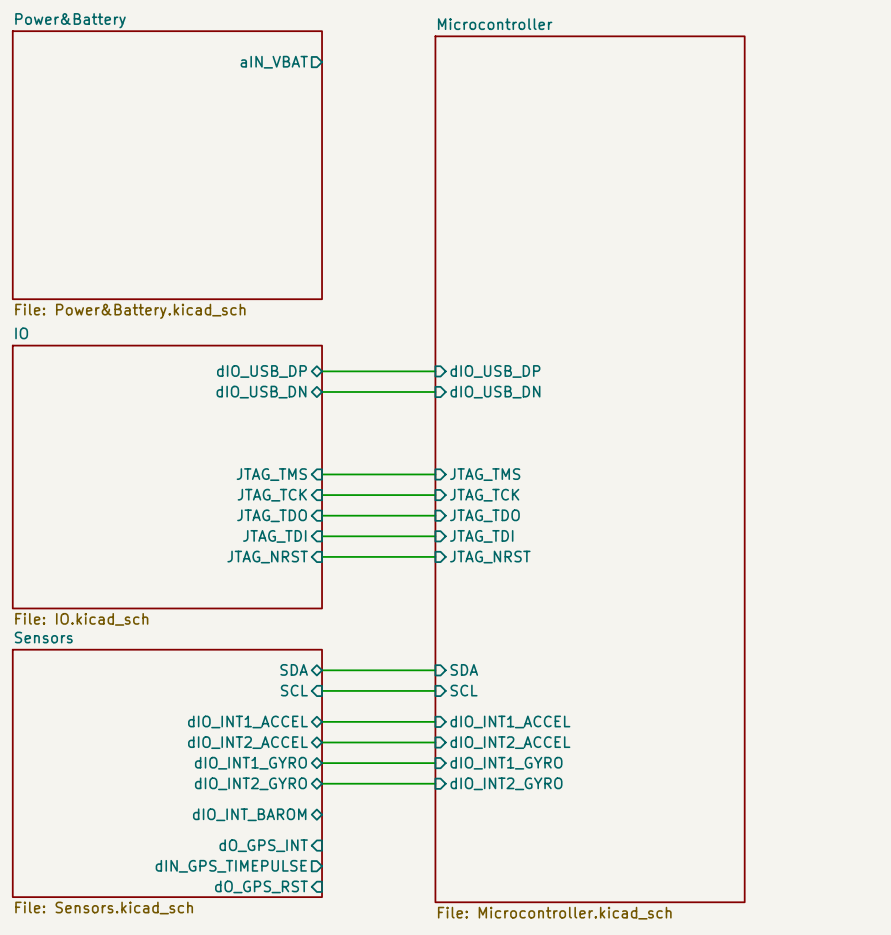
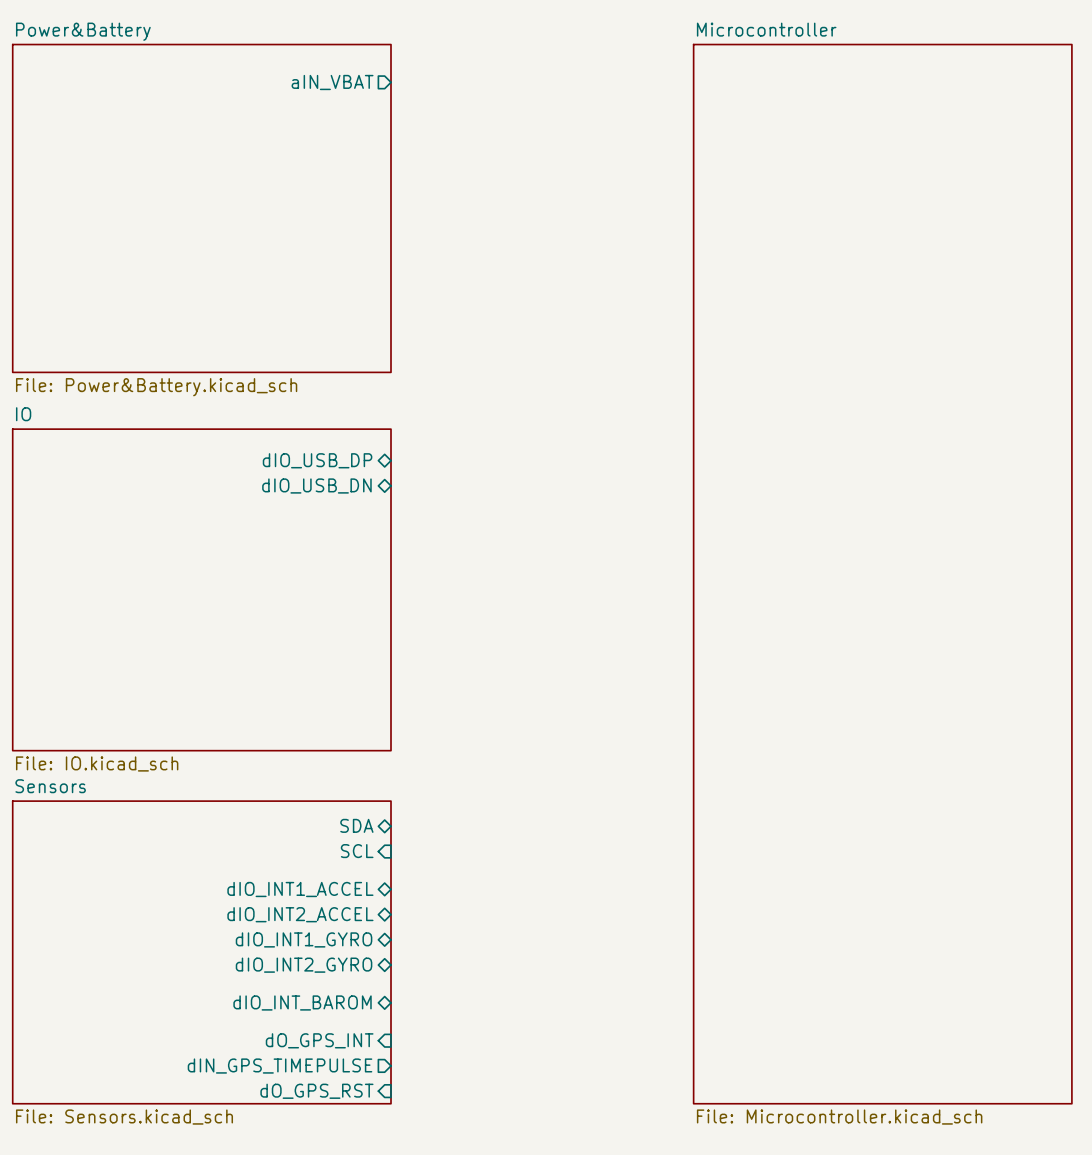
wire: (322, 371) (435, 371) -> none
sheet pin: dIO_USB_DP (495, 371) -> none
wire: (322, 391) (435, 391) -> none
sheet pin: dIO_USB_DN (495, 392) -> none
sheet Microcontroller position: (590, 469) -> (882, 574)
sheet pin: JTAG_TMS (271, 474) -> none
wire: (322, 474) (435, 474) -> none
sheet pin: JTAG_TMS (485, 474) -> none
sheet pin: JTAG_TCK (272, 495) -> none
wire: (322, 495) (435, 495) -> none
sheet pin: JTAG_TCK (484, 495) -> none
sheet pin: JTAG_TDO (272, 515) -> none
wire: (322, 515) (435, 515) -> none
sheet pin: JTAG_TDO (484, 515) -> none
sheet pin: JTAG_TDI (274, 536) -> none
wire: (322, 536) (435, 536) -> none
sheet pin: JTAG_TDI (481, 536) -> none
wire: (322, 556) (435, 556) -> none
sheet pin: JTAG_NRST (267, 557) -> none
sheet pin: JTAG_NRST (490, 557) -> none
sheet pin: SDA (464, 669) -> none
wire: (322, 670) (435, 670) -> none
wire: (322, 690) (435, 690) -> none
sheet pin: SCL (464, 690) -> none
wire: (322, 721) (435, 721) -> none
sheet pin: dIO_INT1_ACCEL (510, 721) -> none
wire: (322, 742) (435, 742) -> none
sheet pin: dIO_INT2_ACCEL (510, 742) -> none
wire: (322, 763) (435, 763) -> none
sheet pin: dIO_INT1_GYRO (506, 763) -> none
wire: (322, 783) (435, 783) -> none
sheet pin: dIO_INT2_GYRO (506, 783) -> none

